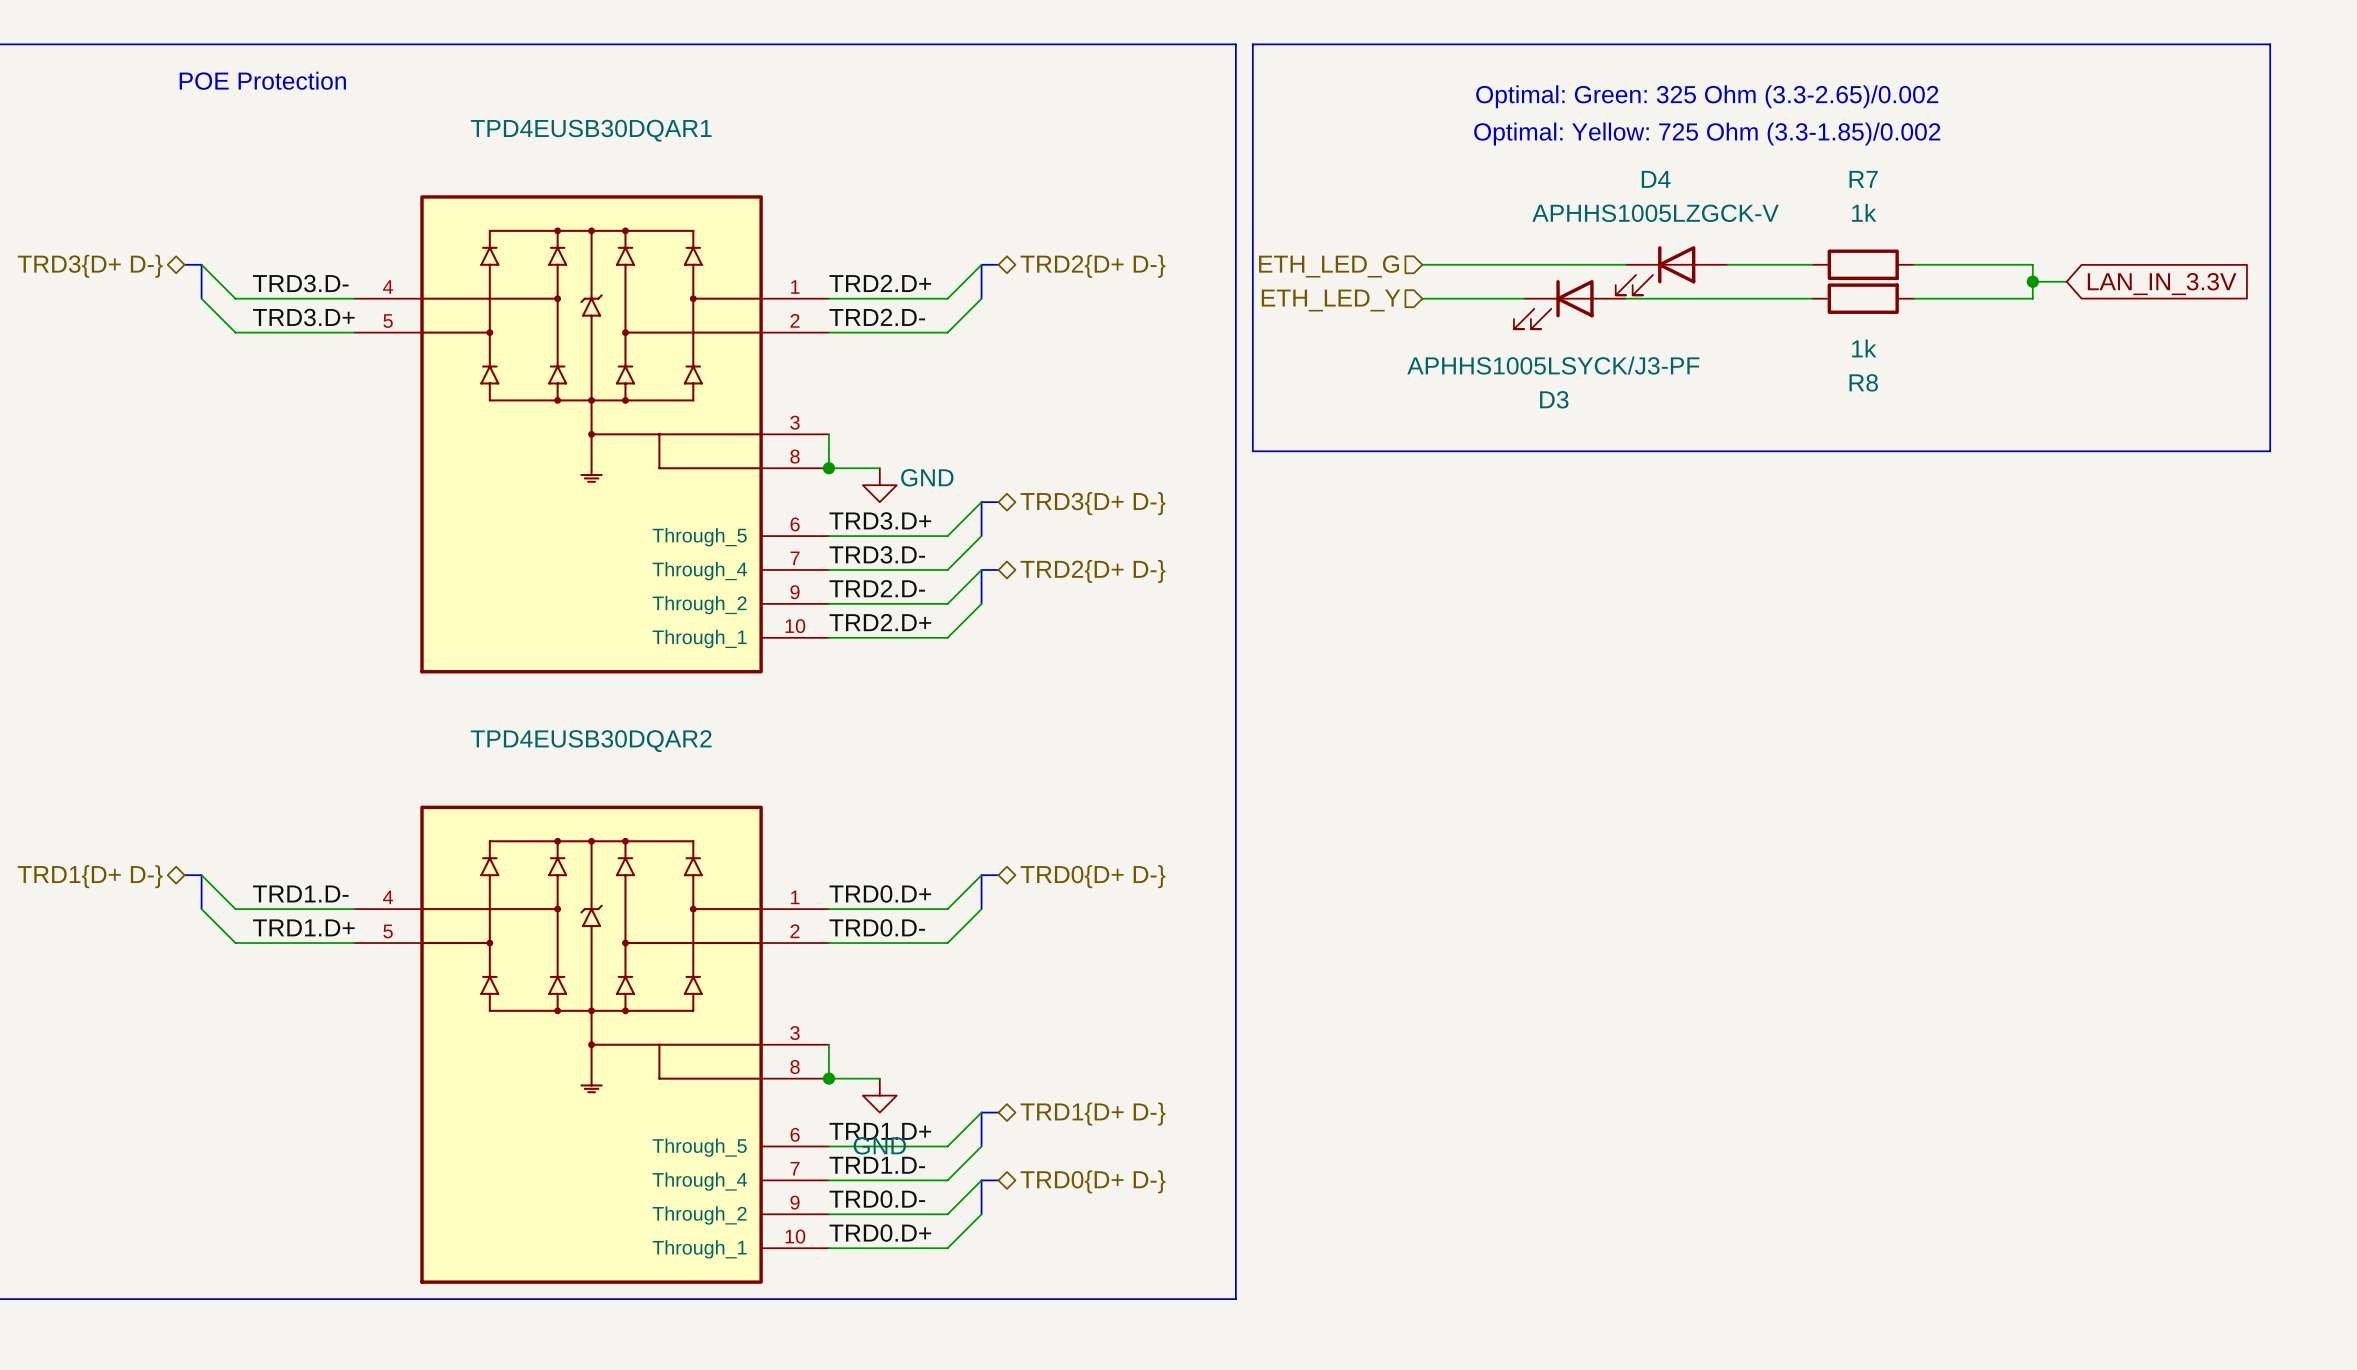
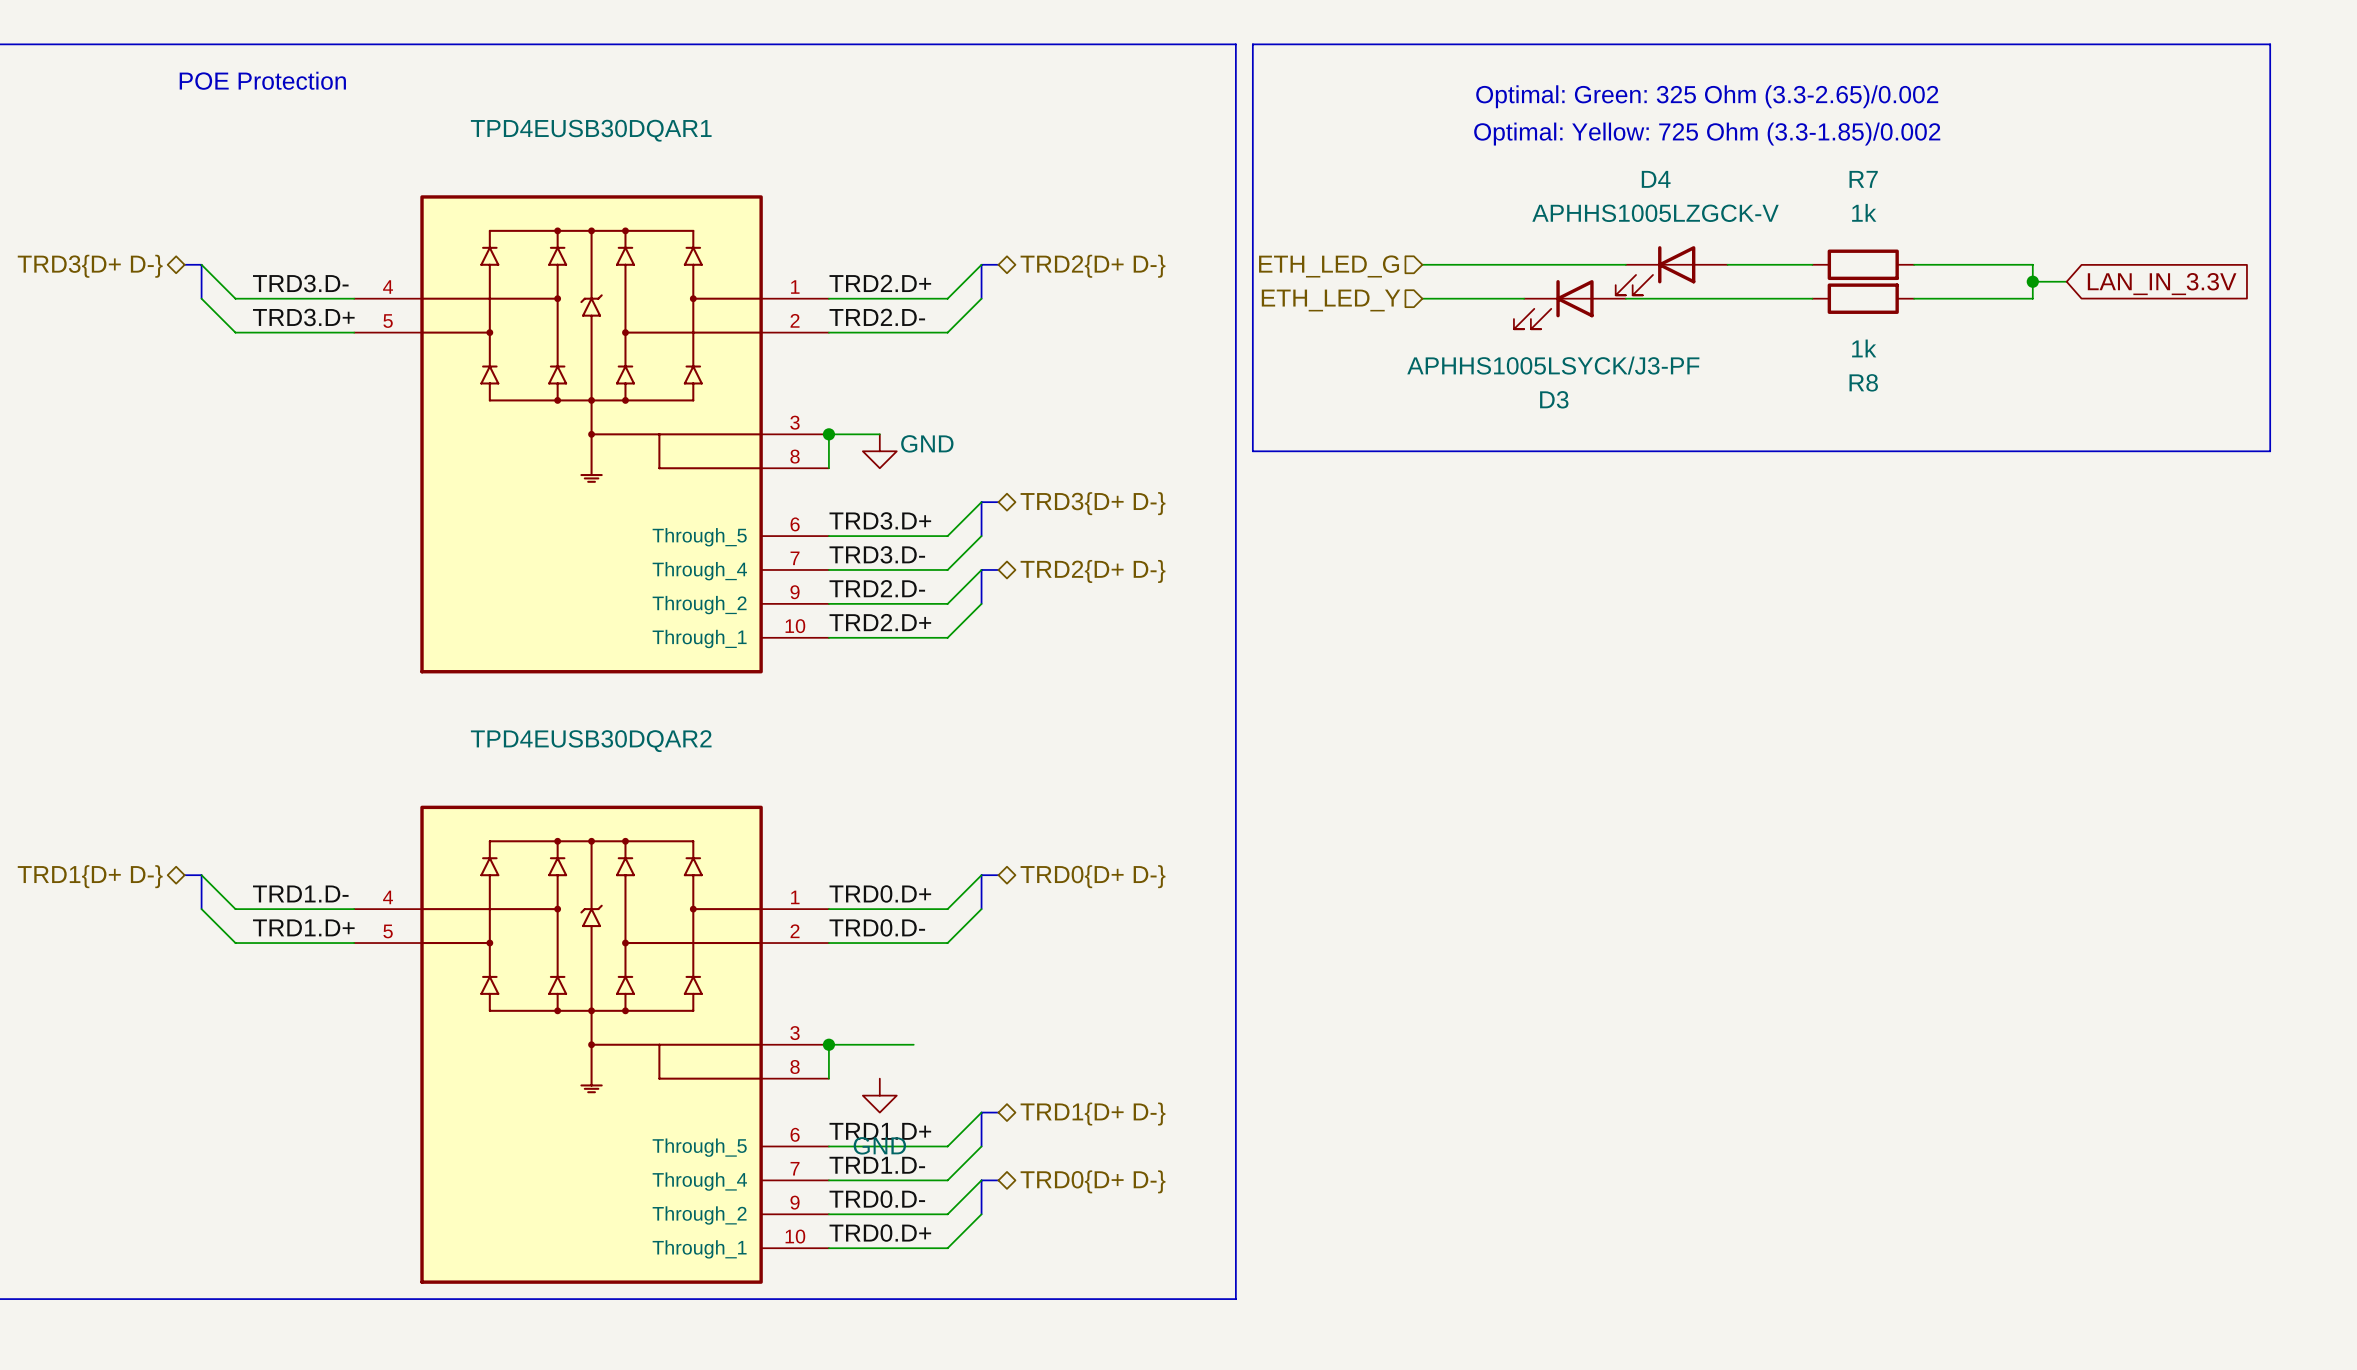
wire: (828, 468) (879, 468) -> (828, 434) (879, 434)
junction position: (828, 468) -> (828, 434)
power symbol position: GND (879, 485) -> GND (879, 451)
wire: none -> (828, 1044) (913, 1044)
wire: (828, 1078) (879, 1078) -> none
junction position: (828, 1078) -> (828, 1044)

